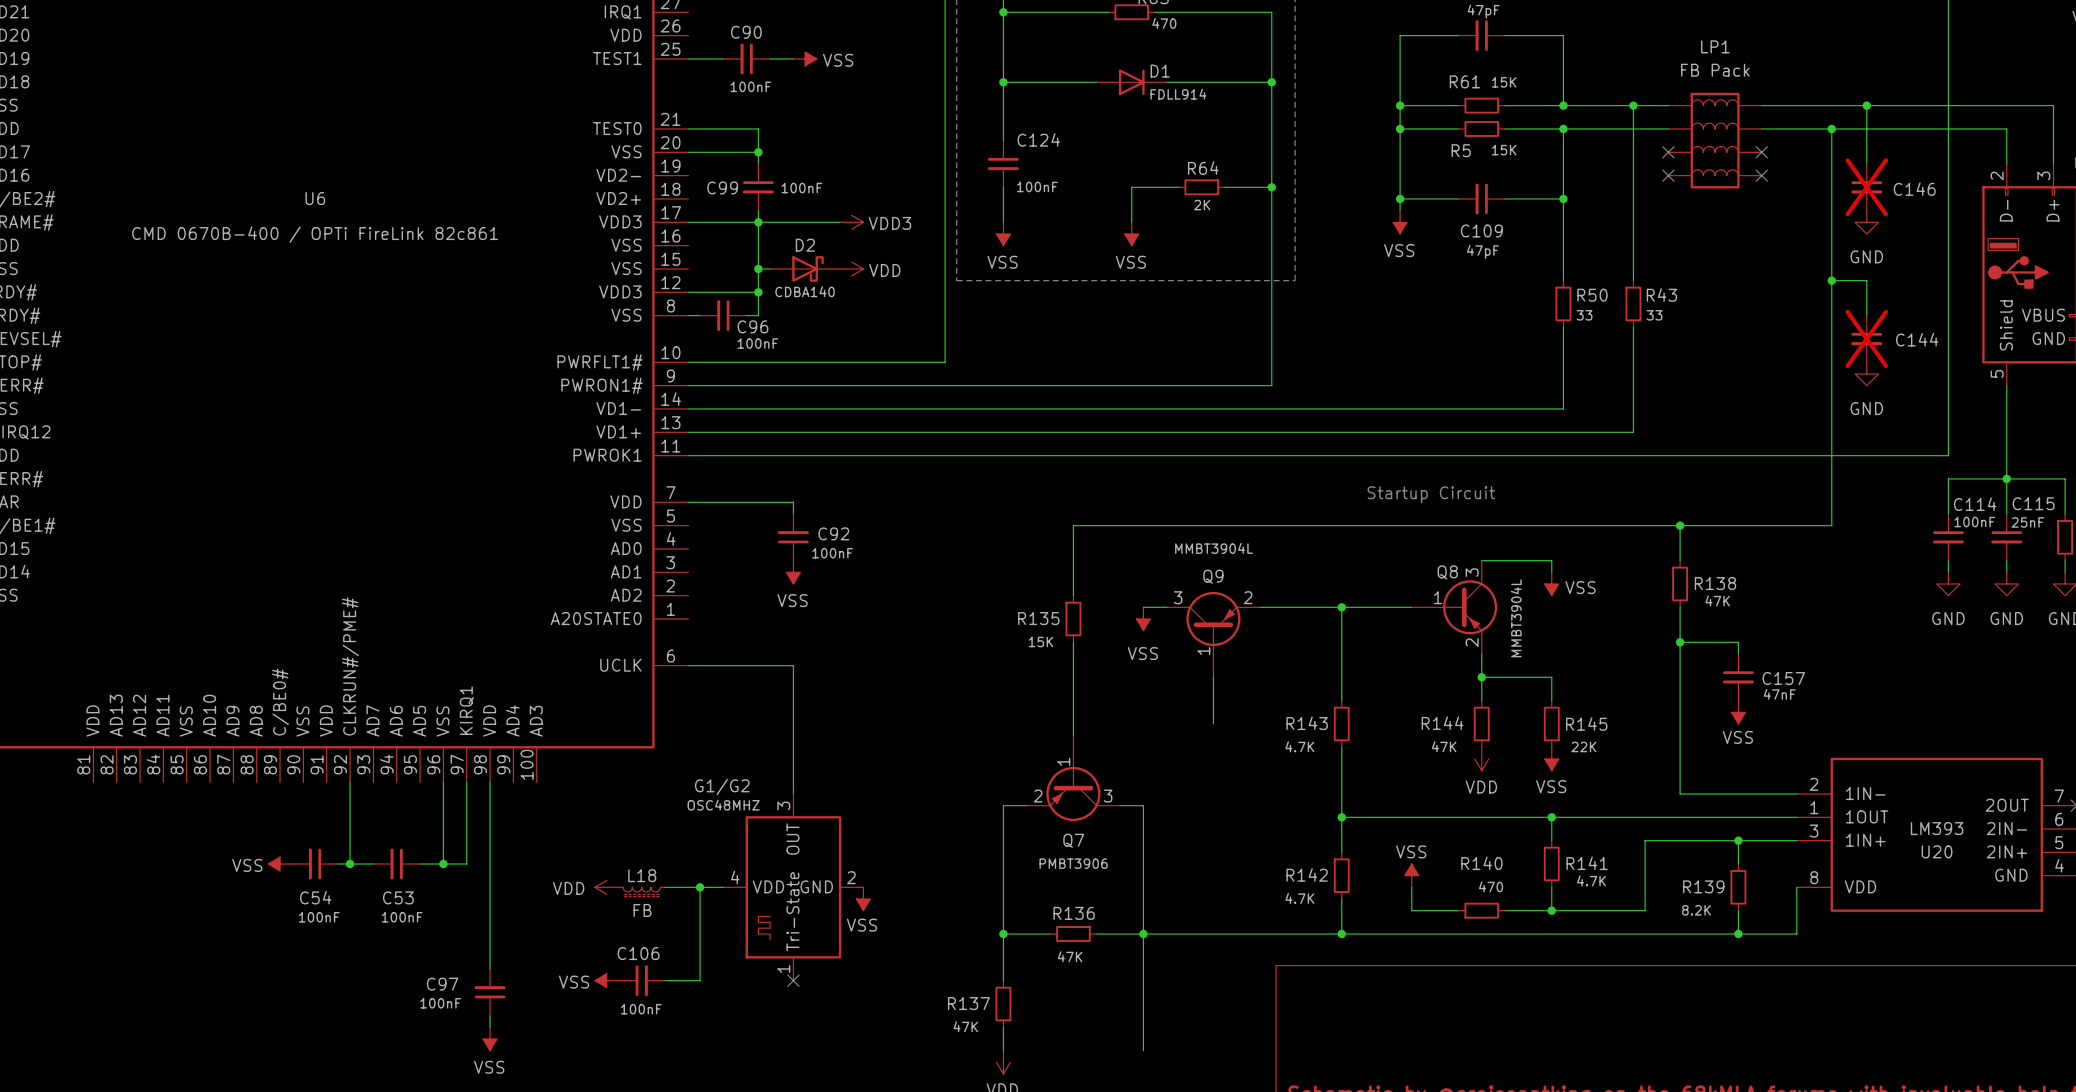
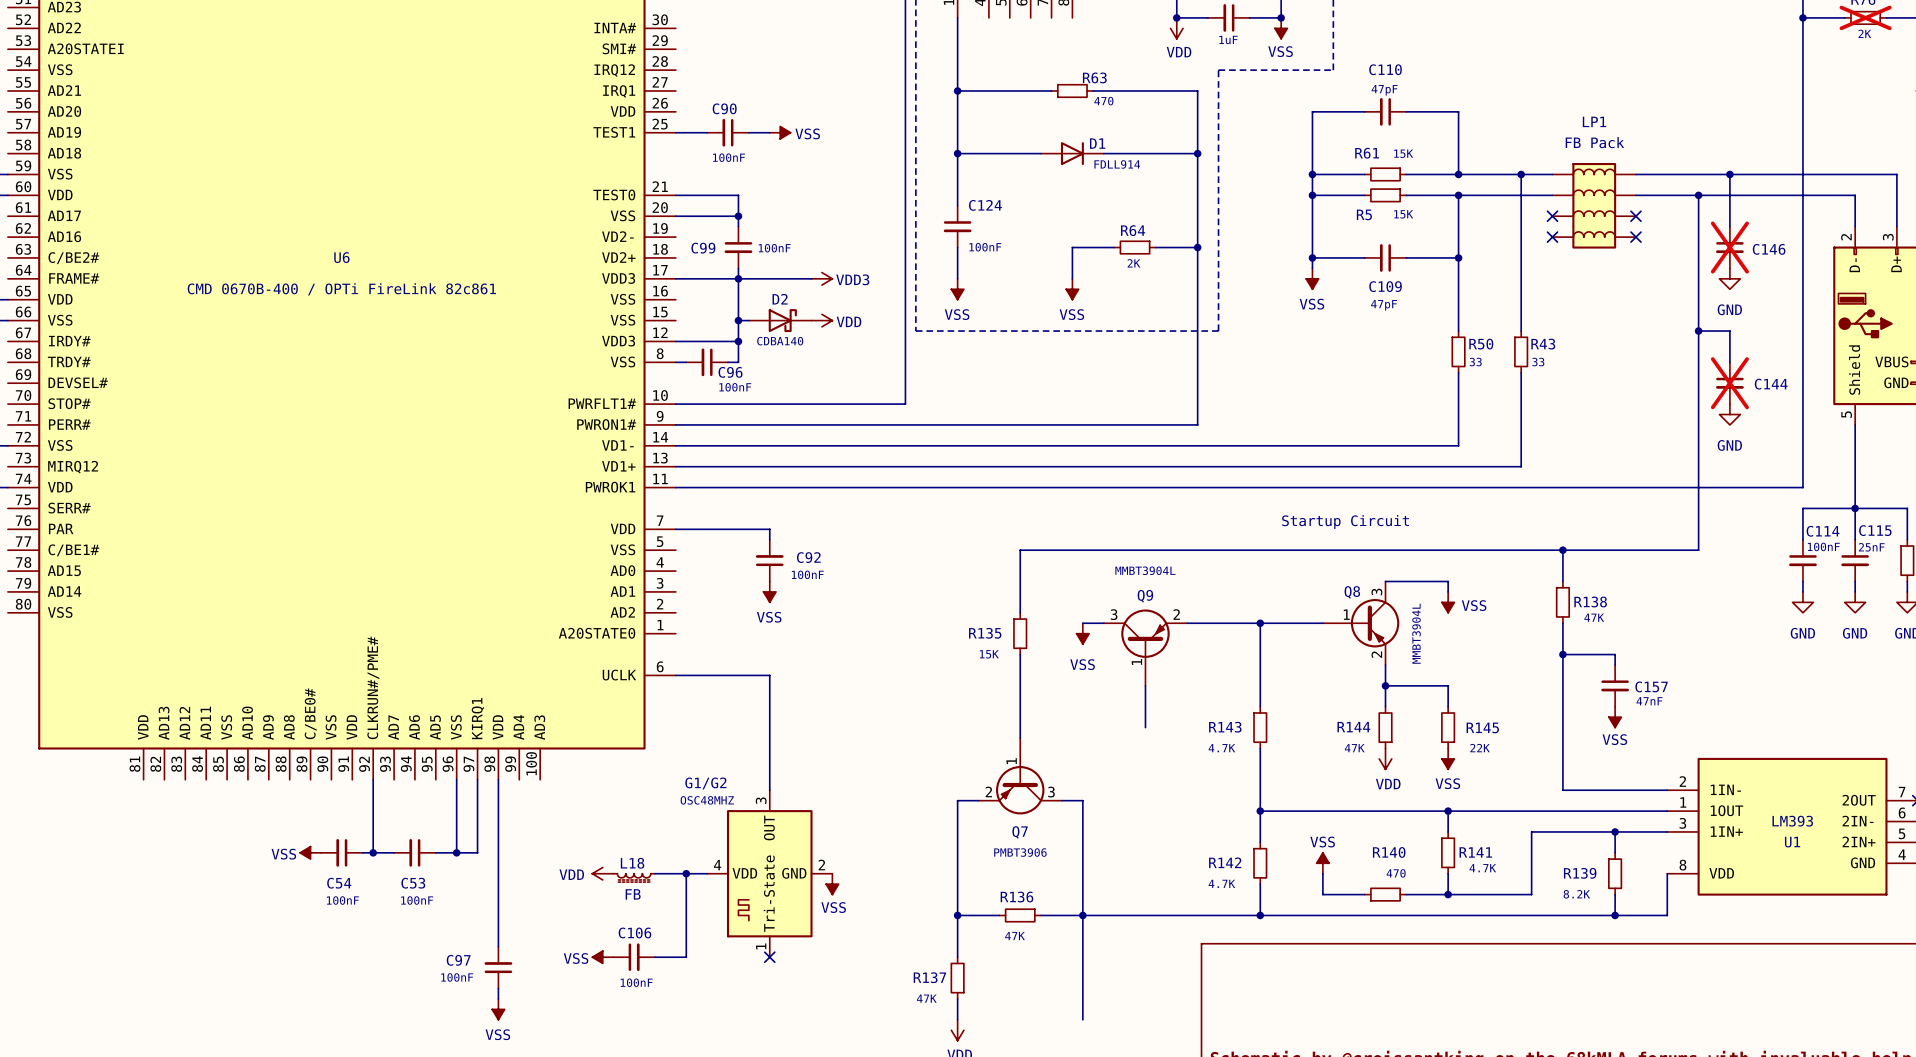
U20 name: U20 (1937, 851) -> U1 (1792, 842)

